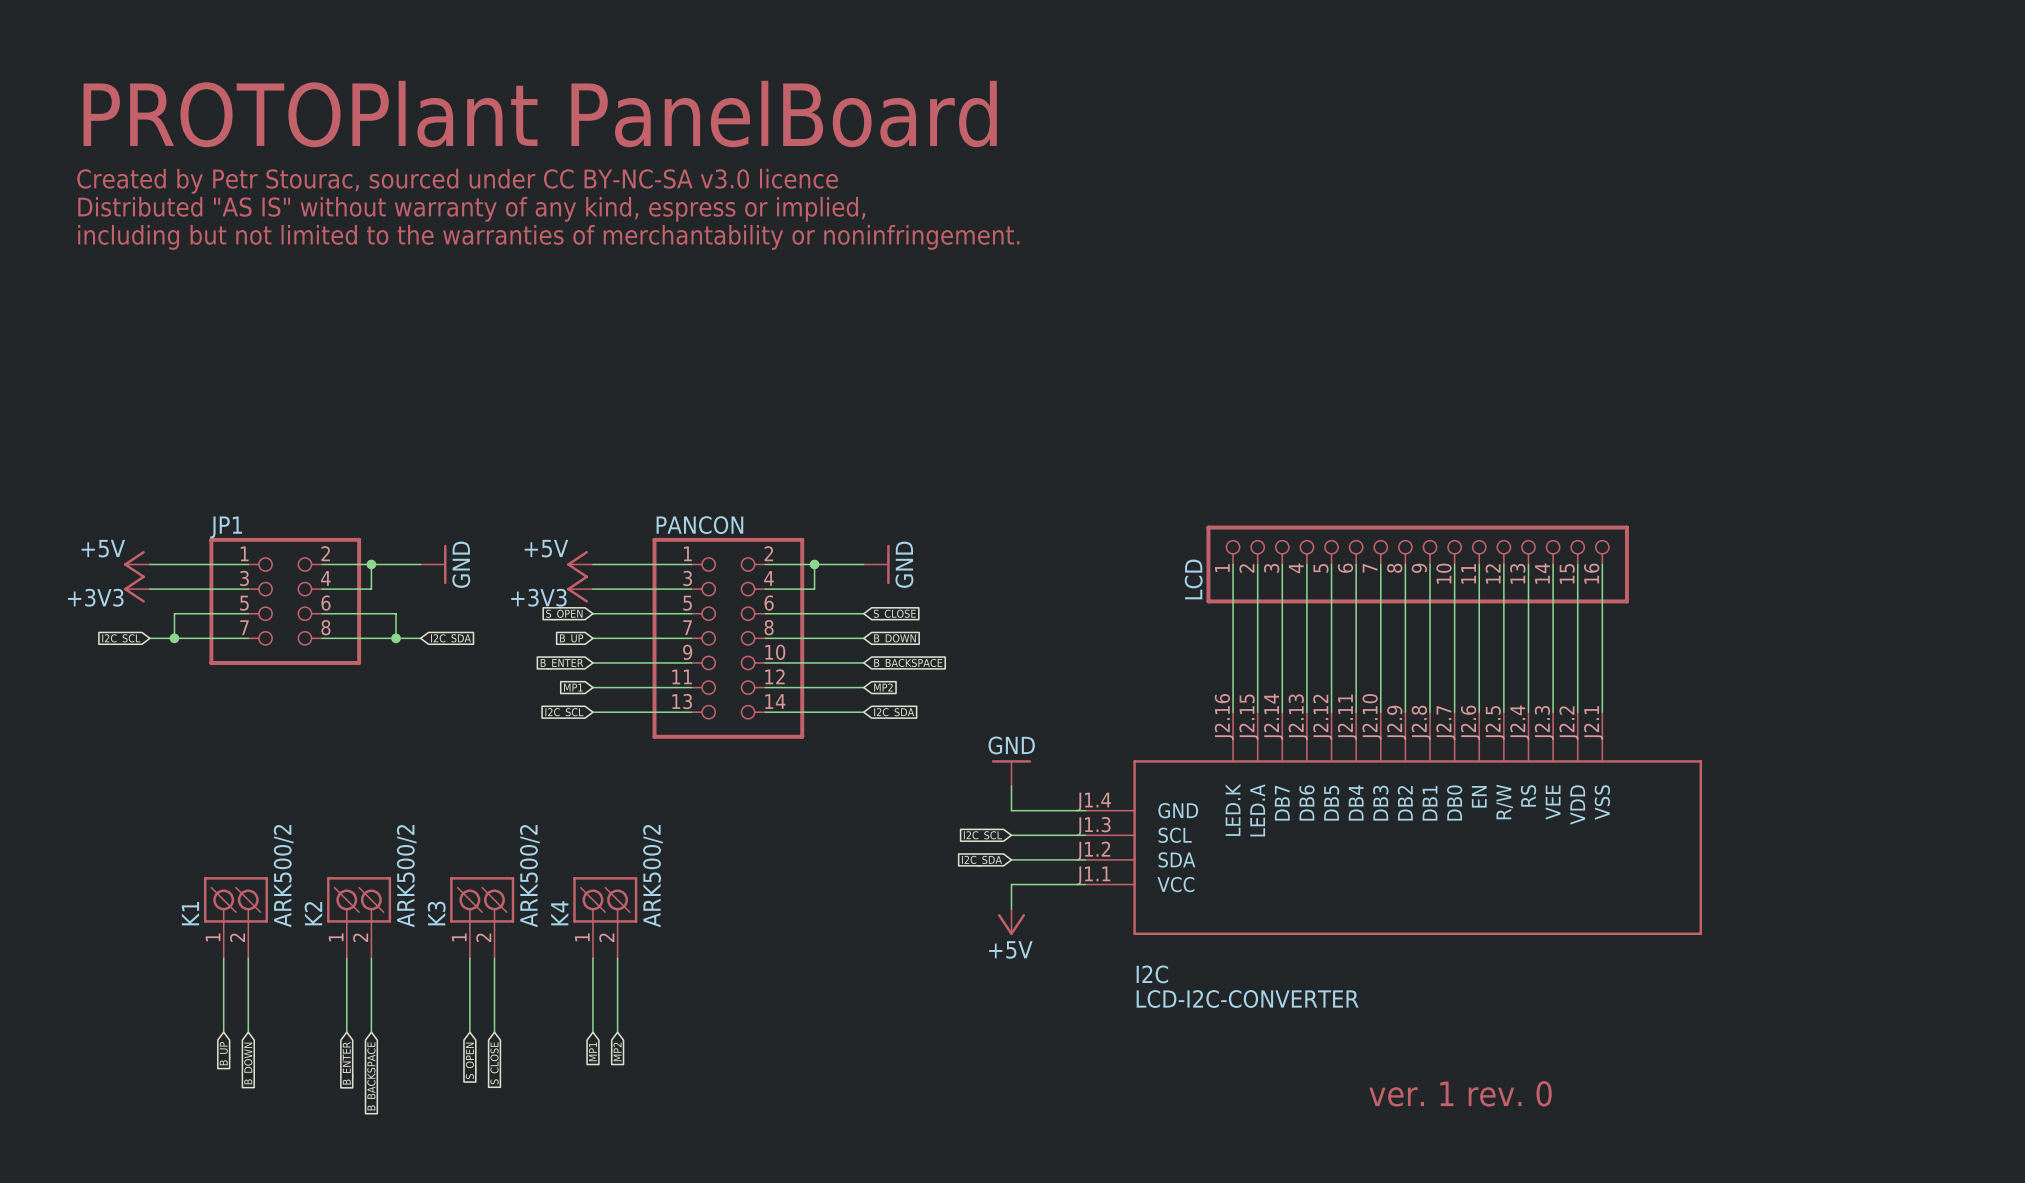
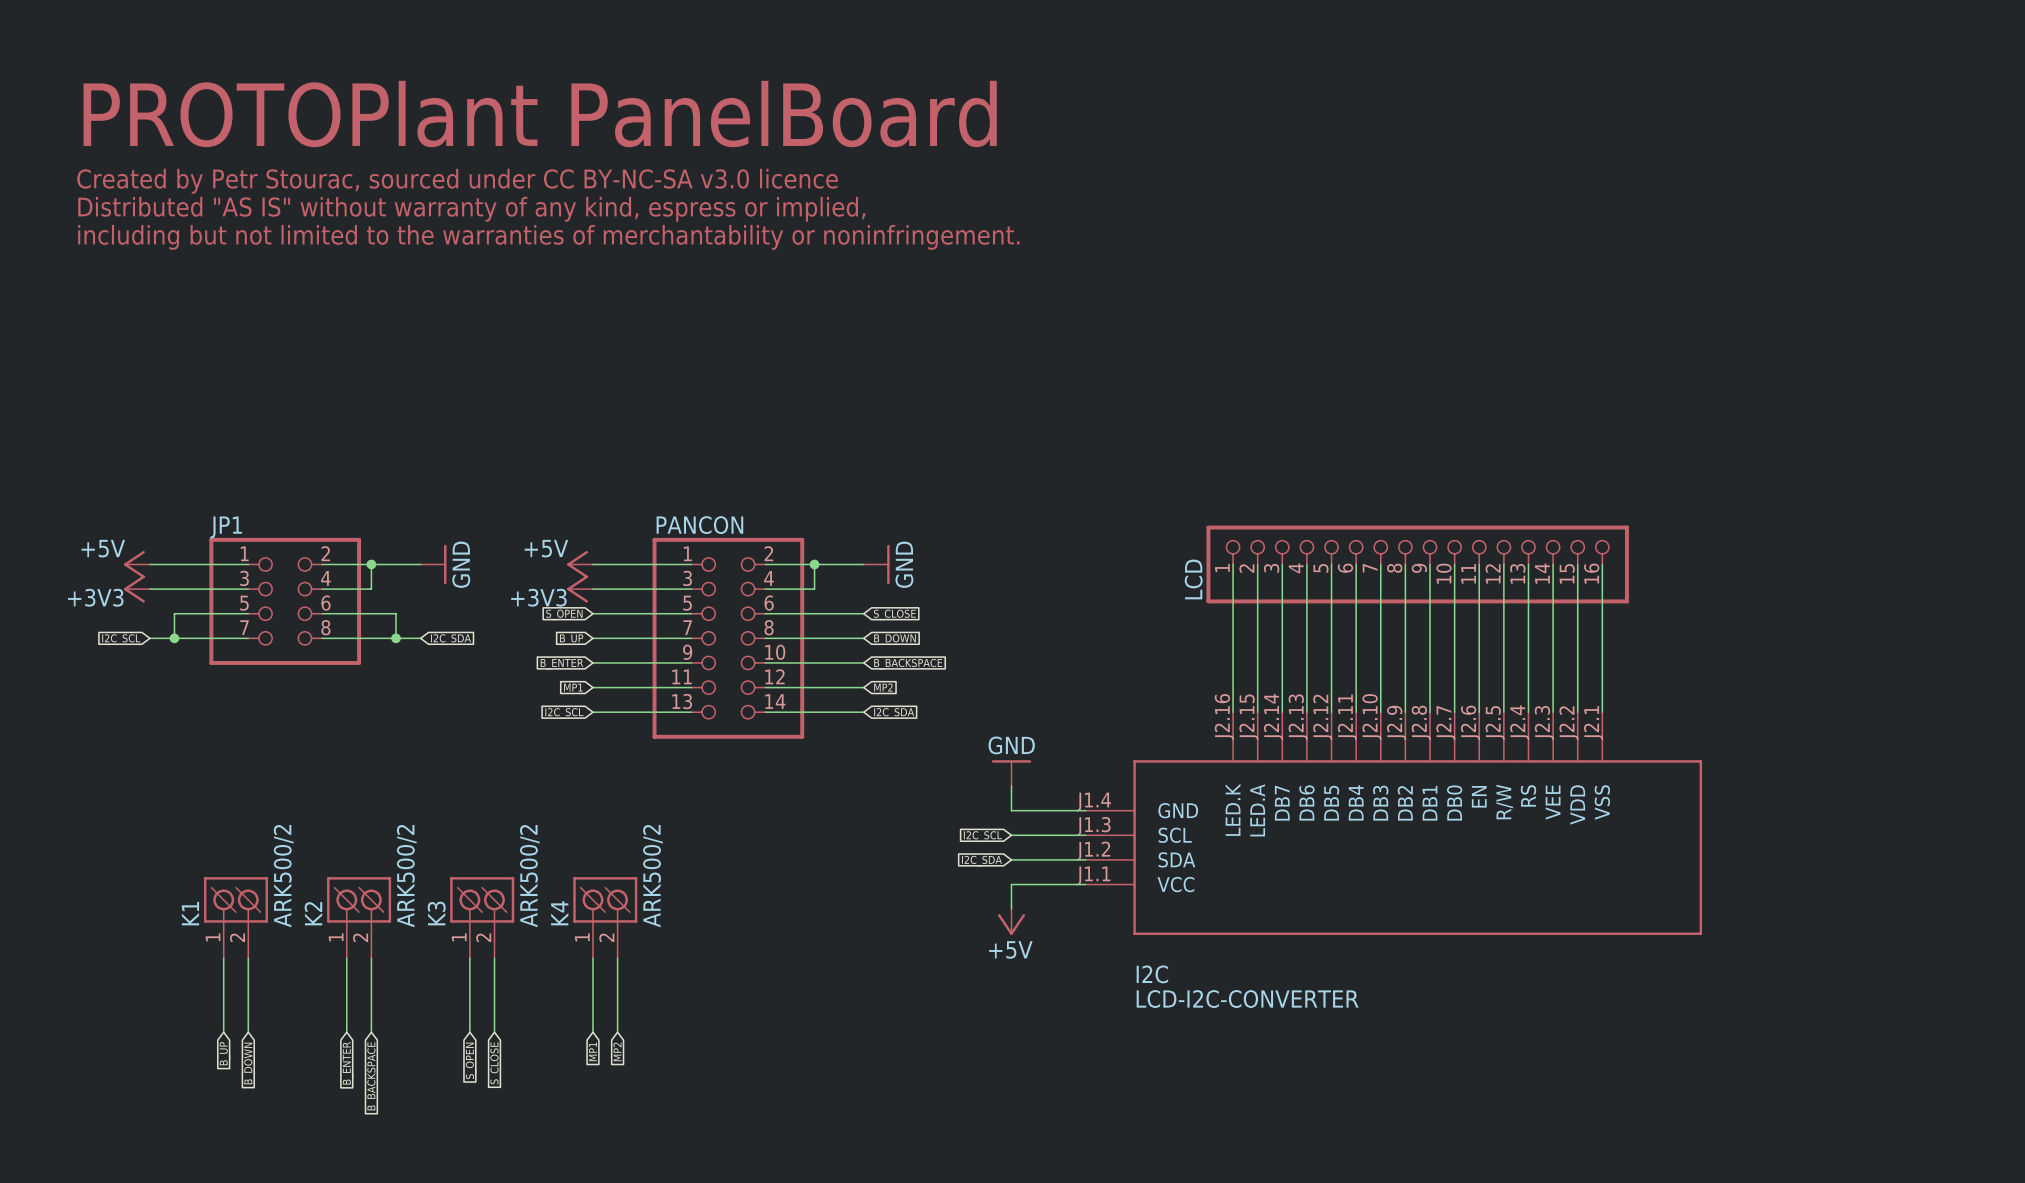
text: ver. 1 rev. 0 (1460, 1093) -> none

